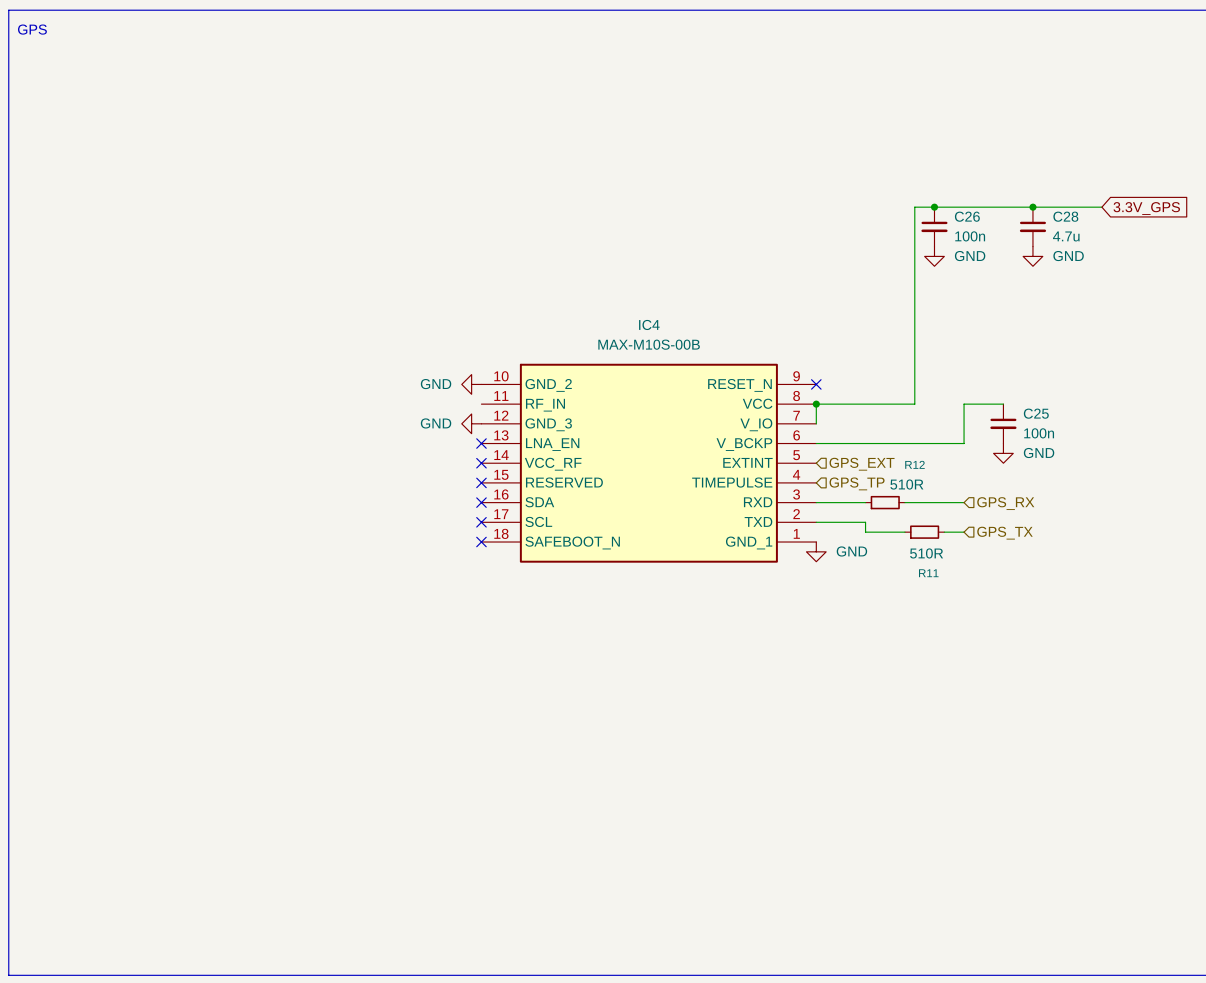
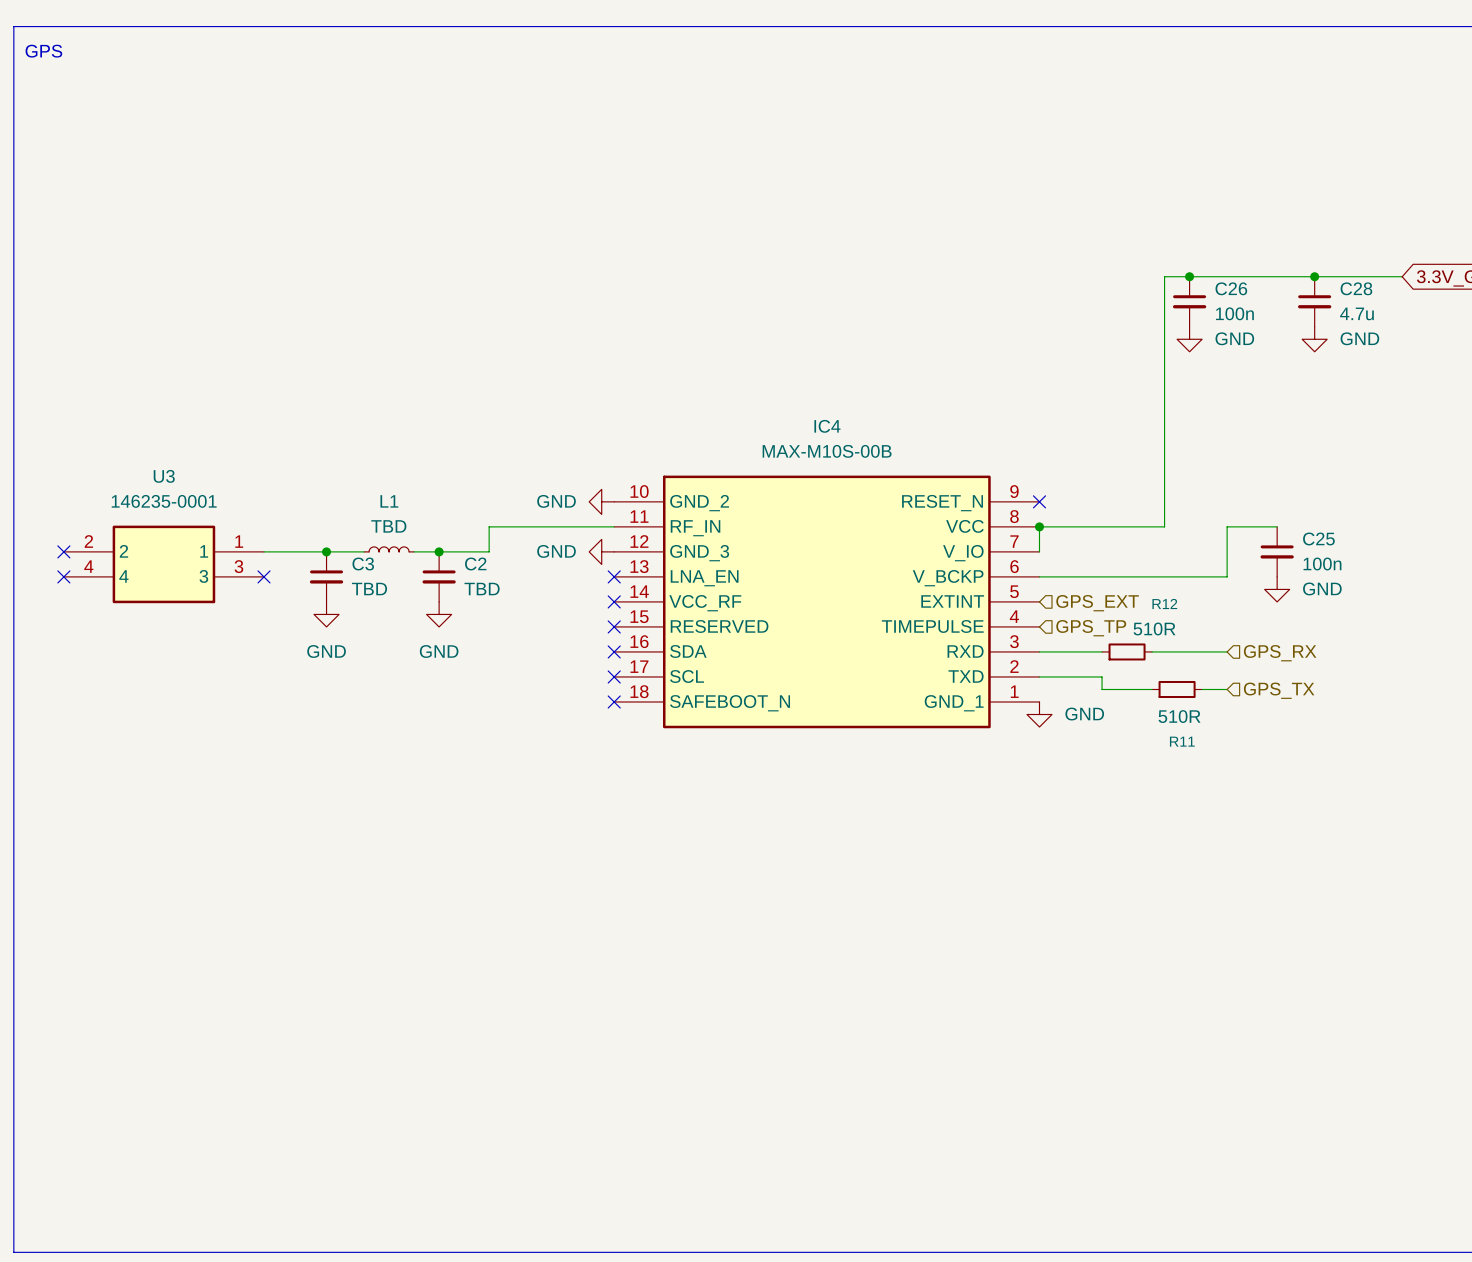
wire: none -> (614, 526) (489, 526) (489, 551) (414, 551)
L1: none -> TBD (389, 549)
no-connect mark: none -> (63, 551)
wire: none -> (264, 551) (364, 551)
junction: none -> (326, 551)
junction: none -> (439, 551)
U3: none -> 146235-0001 (163, 564)
no-connect mark: none -> (63, 576)
no-connect mark: none -> (264, 576)
C3: none -> TBD (326, 576)
C2: none -> TBD (439, 576)
power symbol: none -> GND (326, 614)
power symbol: none -> GND (439, 614)

